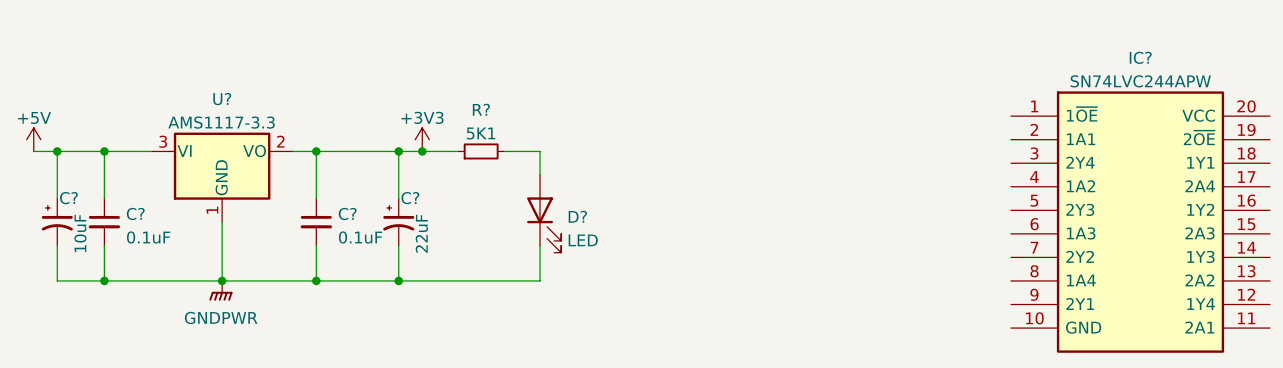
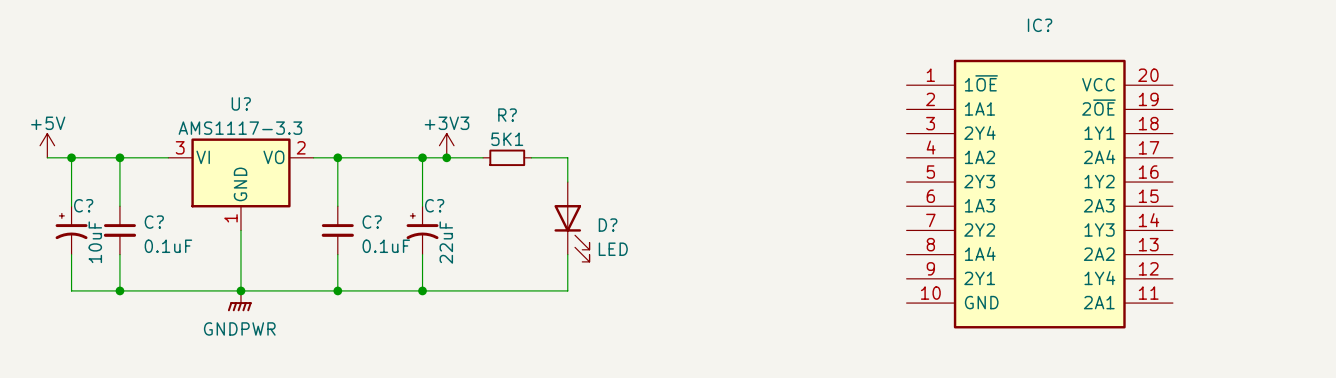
IC?: none -> (1039, 194)
IC?: SN74LVC244APW (1140, 222) -> none

